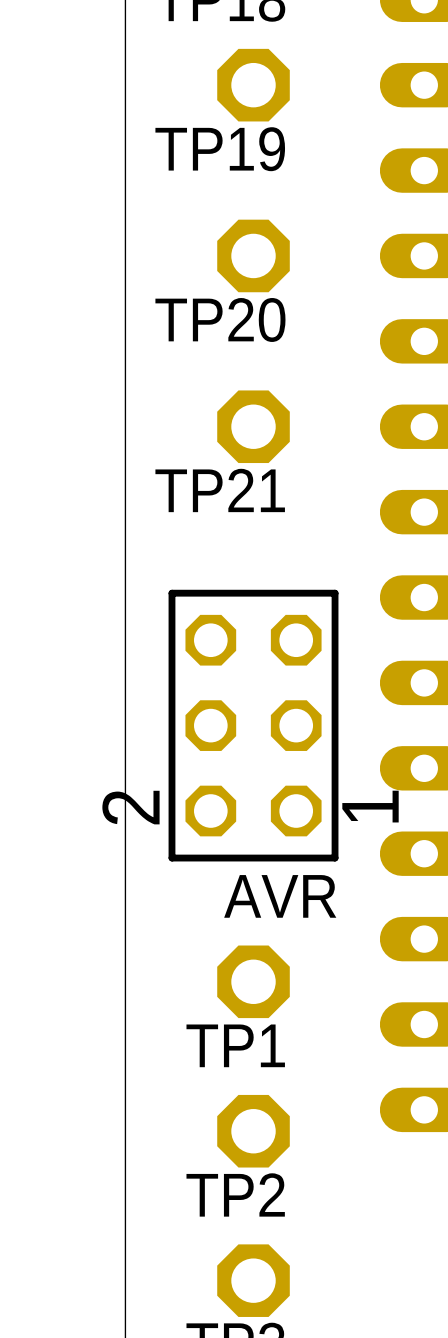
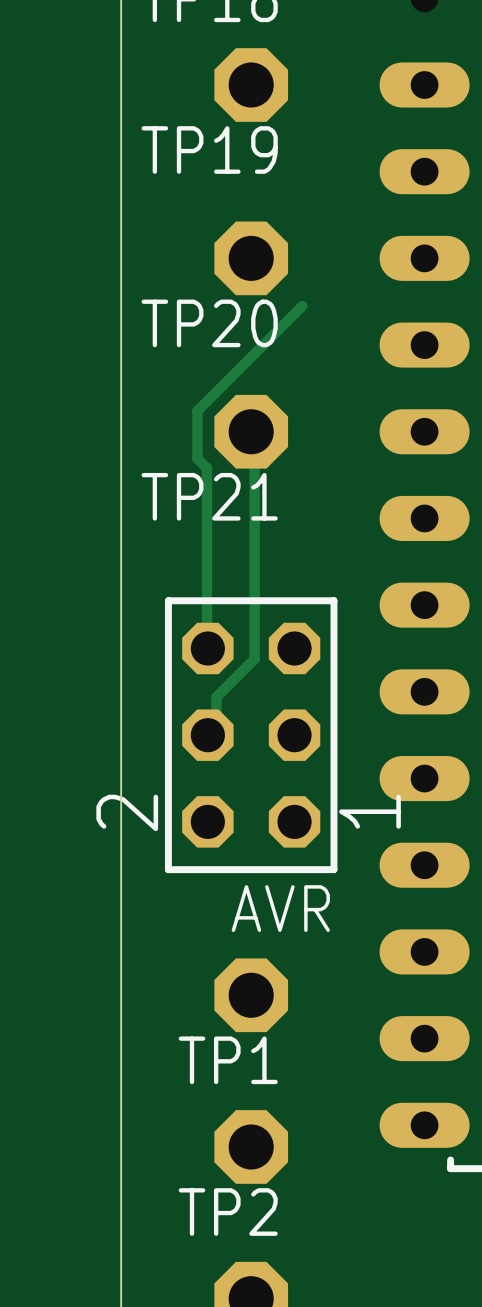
track: none -> (302, 306) (197, 410) (197, 458) (206, 468) (207, 648)
track: none -> (251, 431) (254, 439) (254, 658) (216, 697) (216, 735) (207, 735)

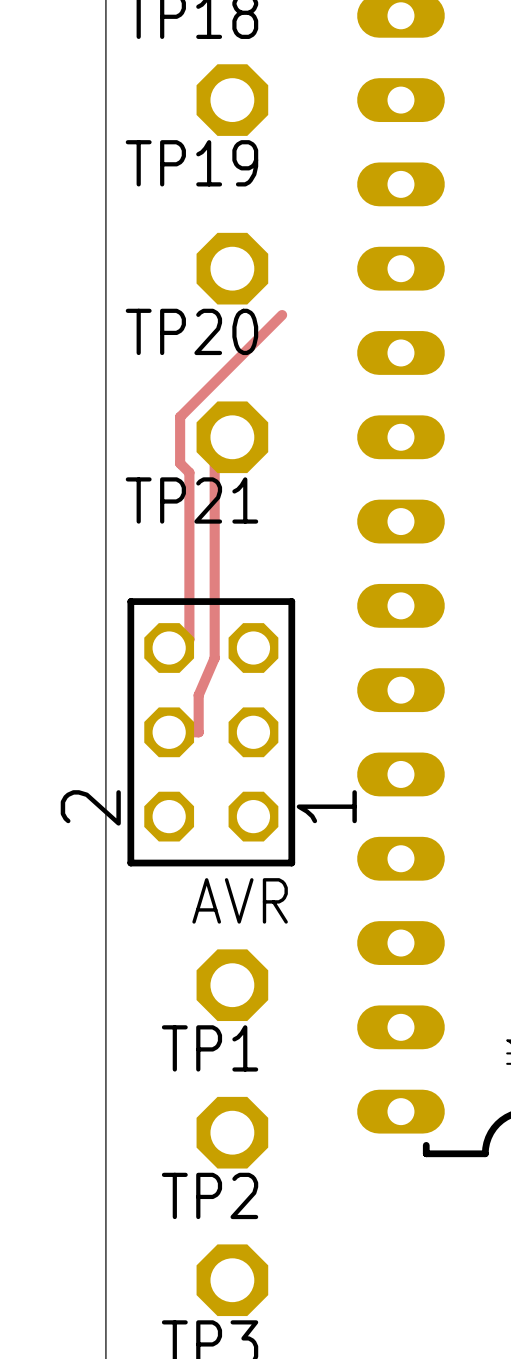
track: (251, 431) (254, 439) (254, 658) (216, 697) -> (232, 437) (214, 444) (214, 658) (198, 695)
AVR position: (251, 735) -> (211, 732)

